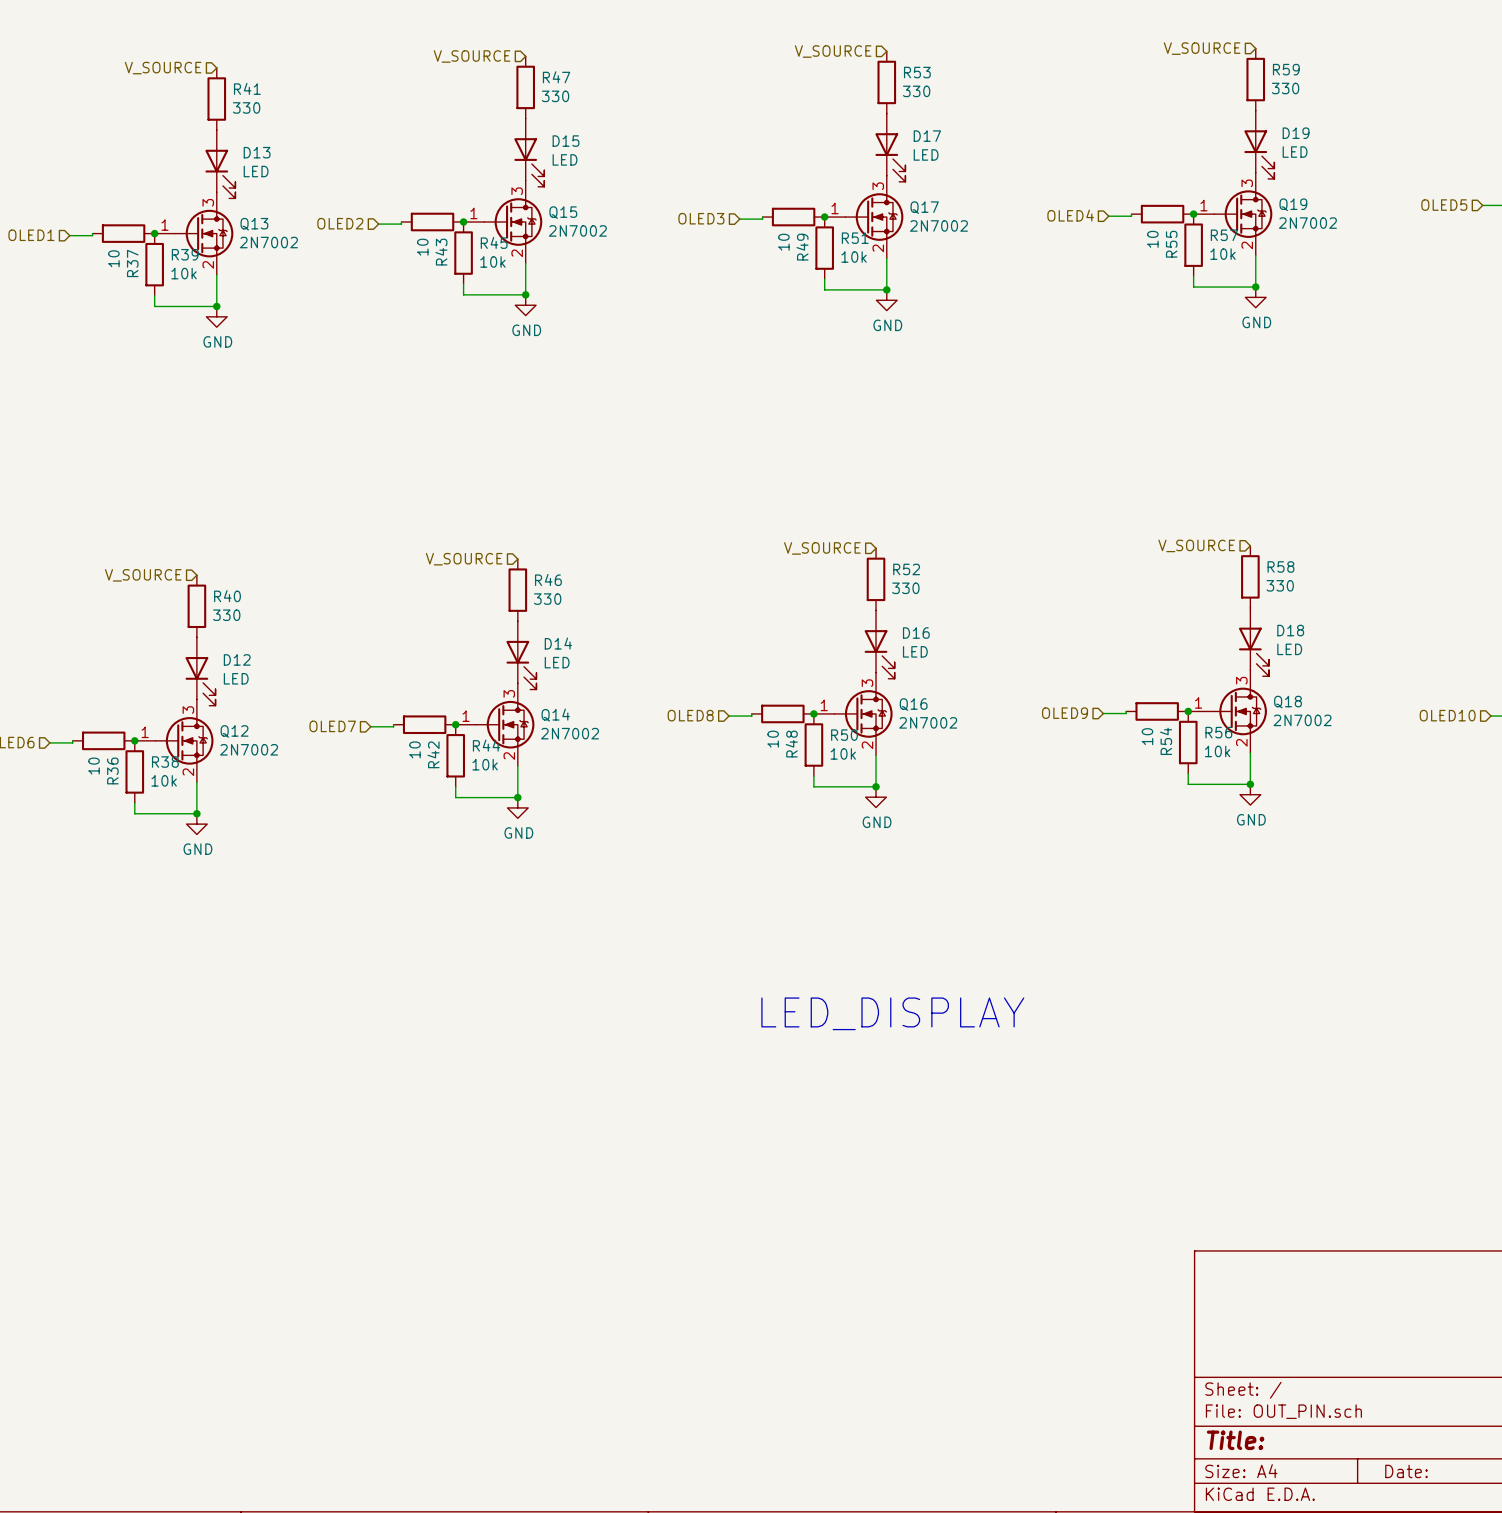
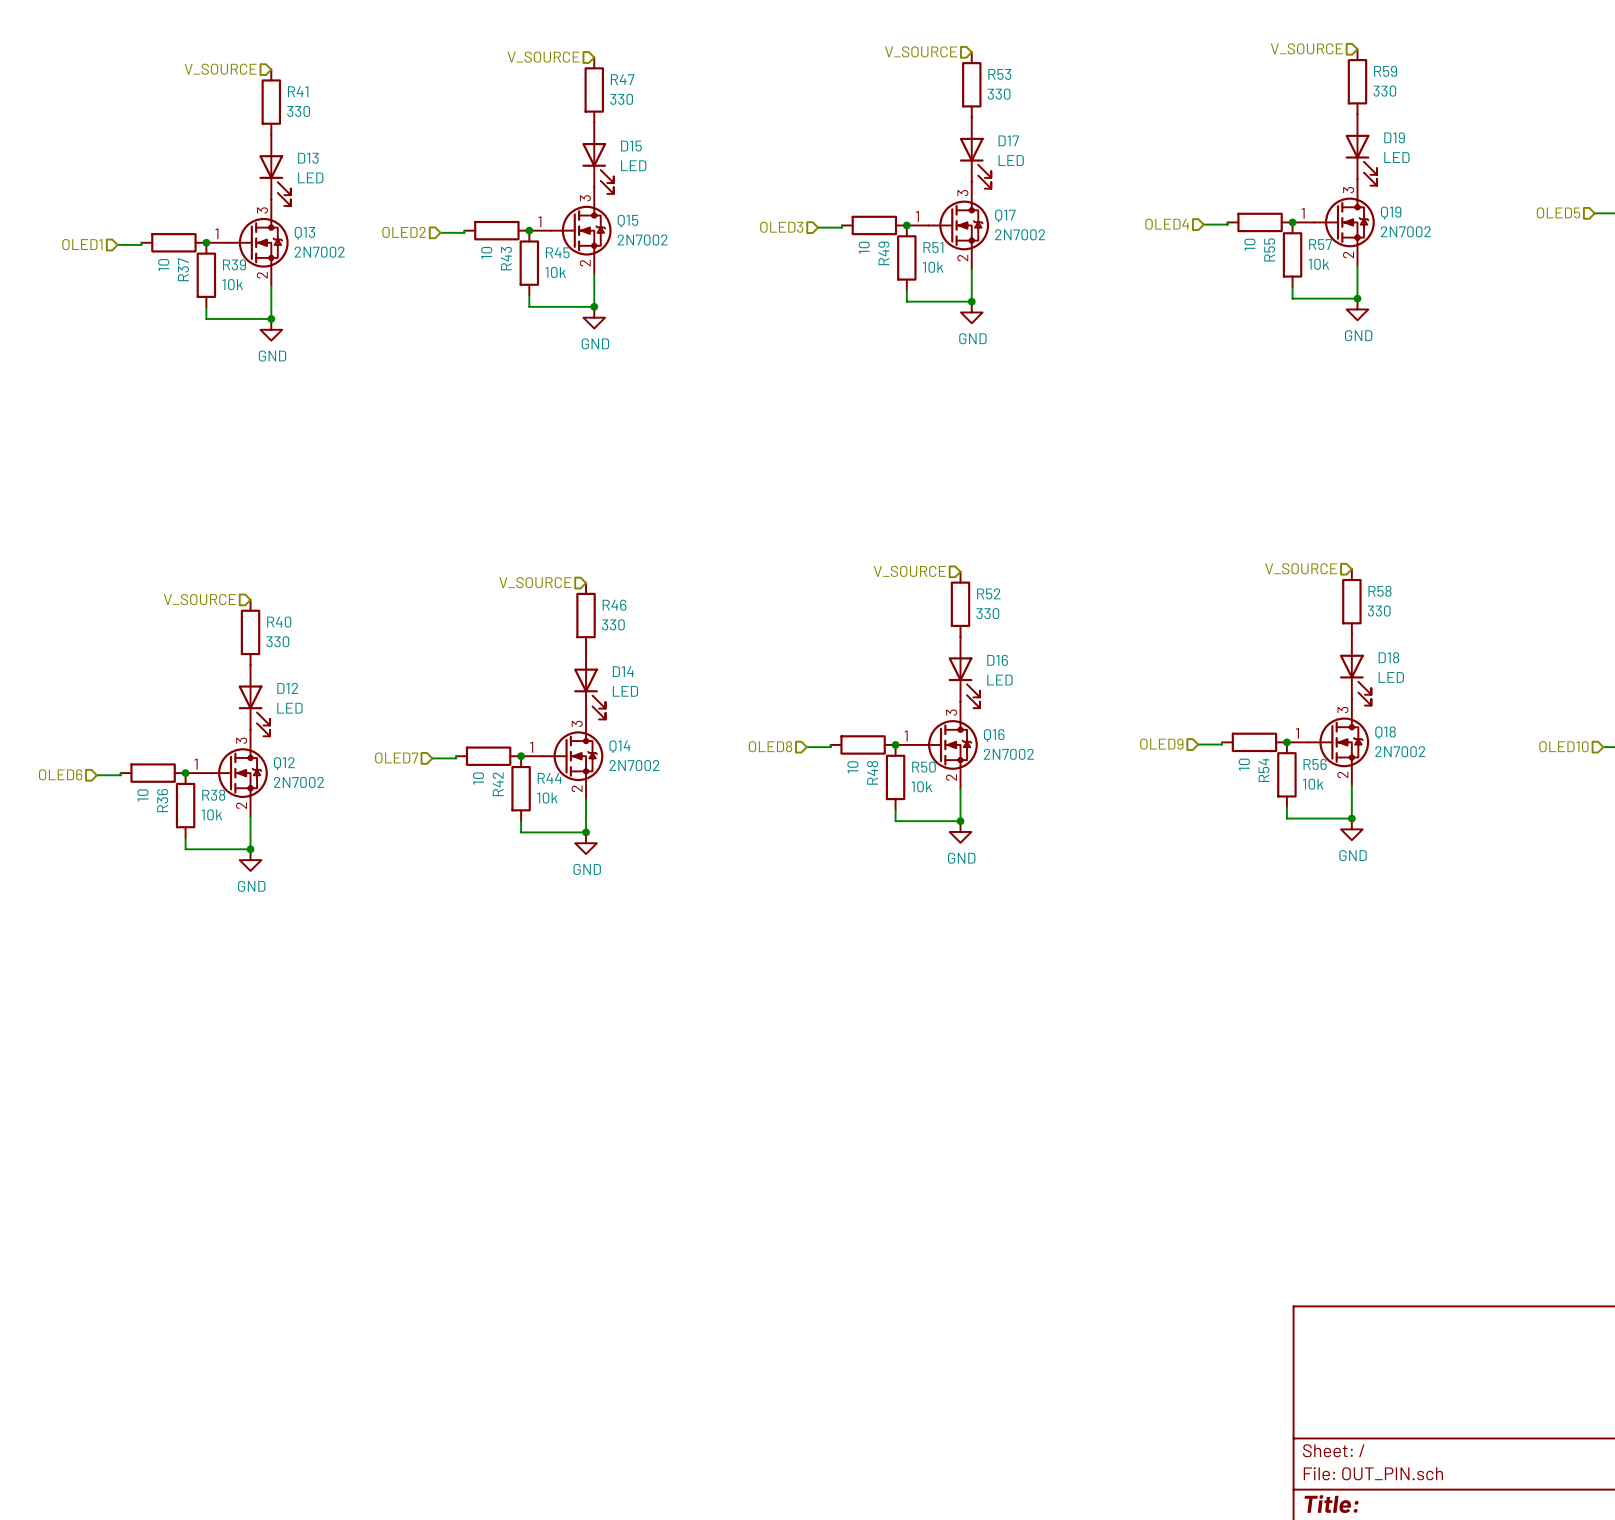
text: LED_DISPLAY (892, 1013) -> none

